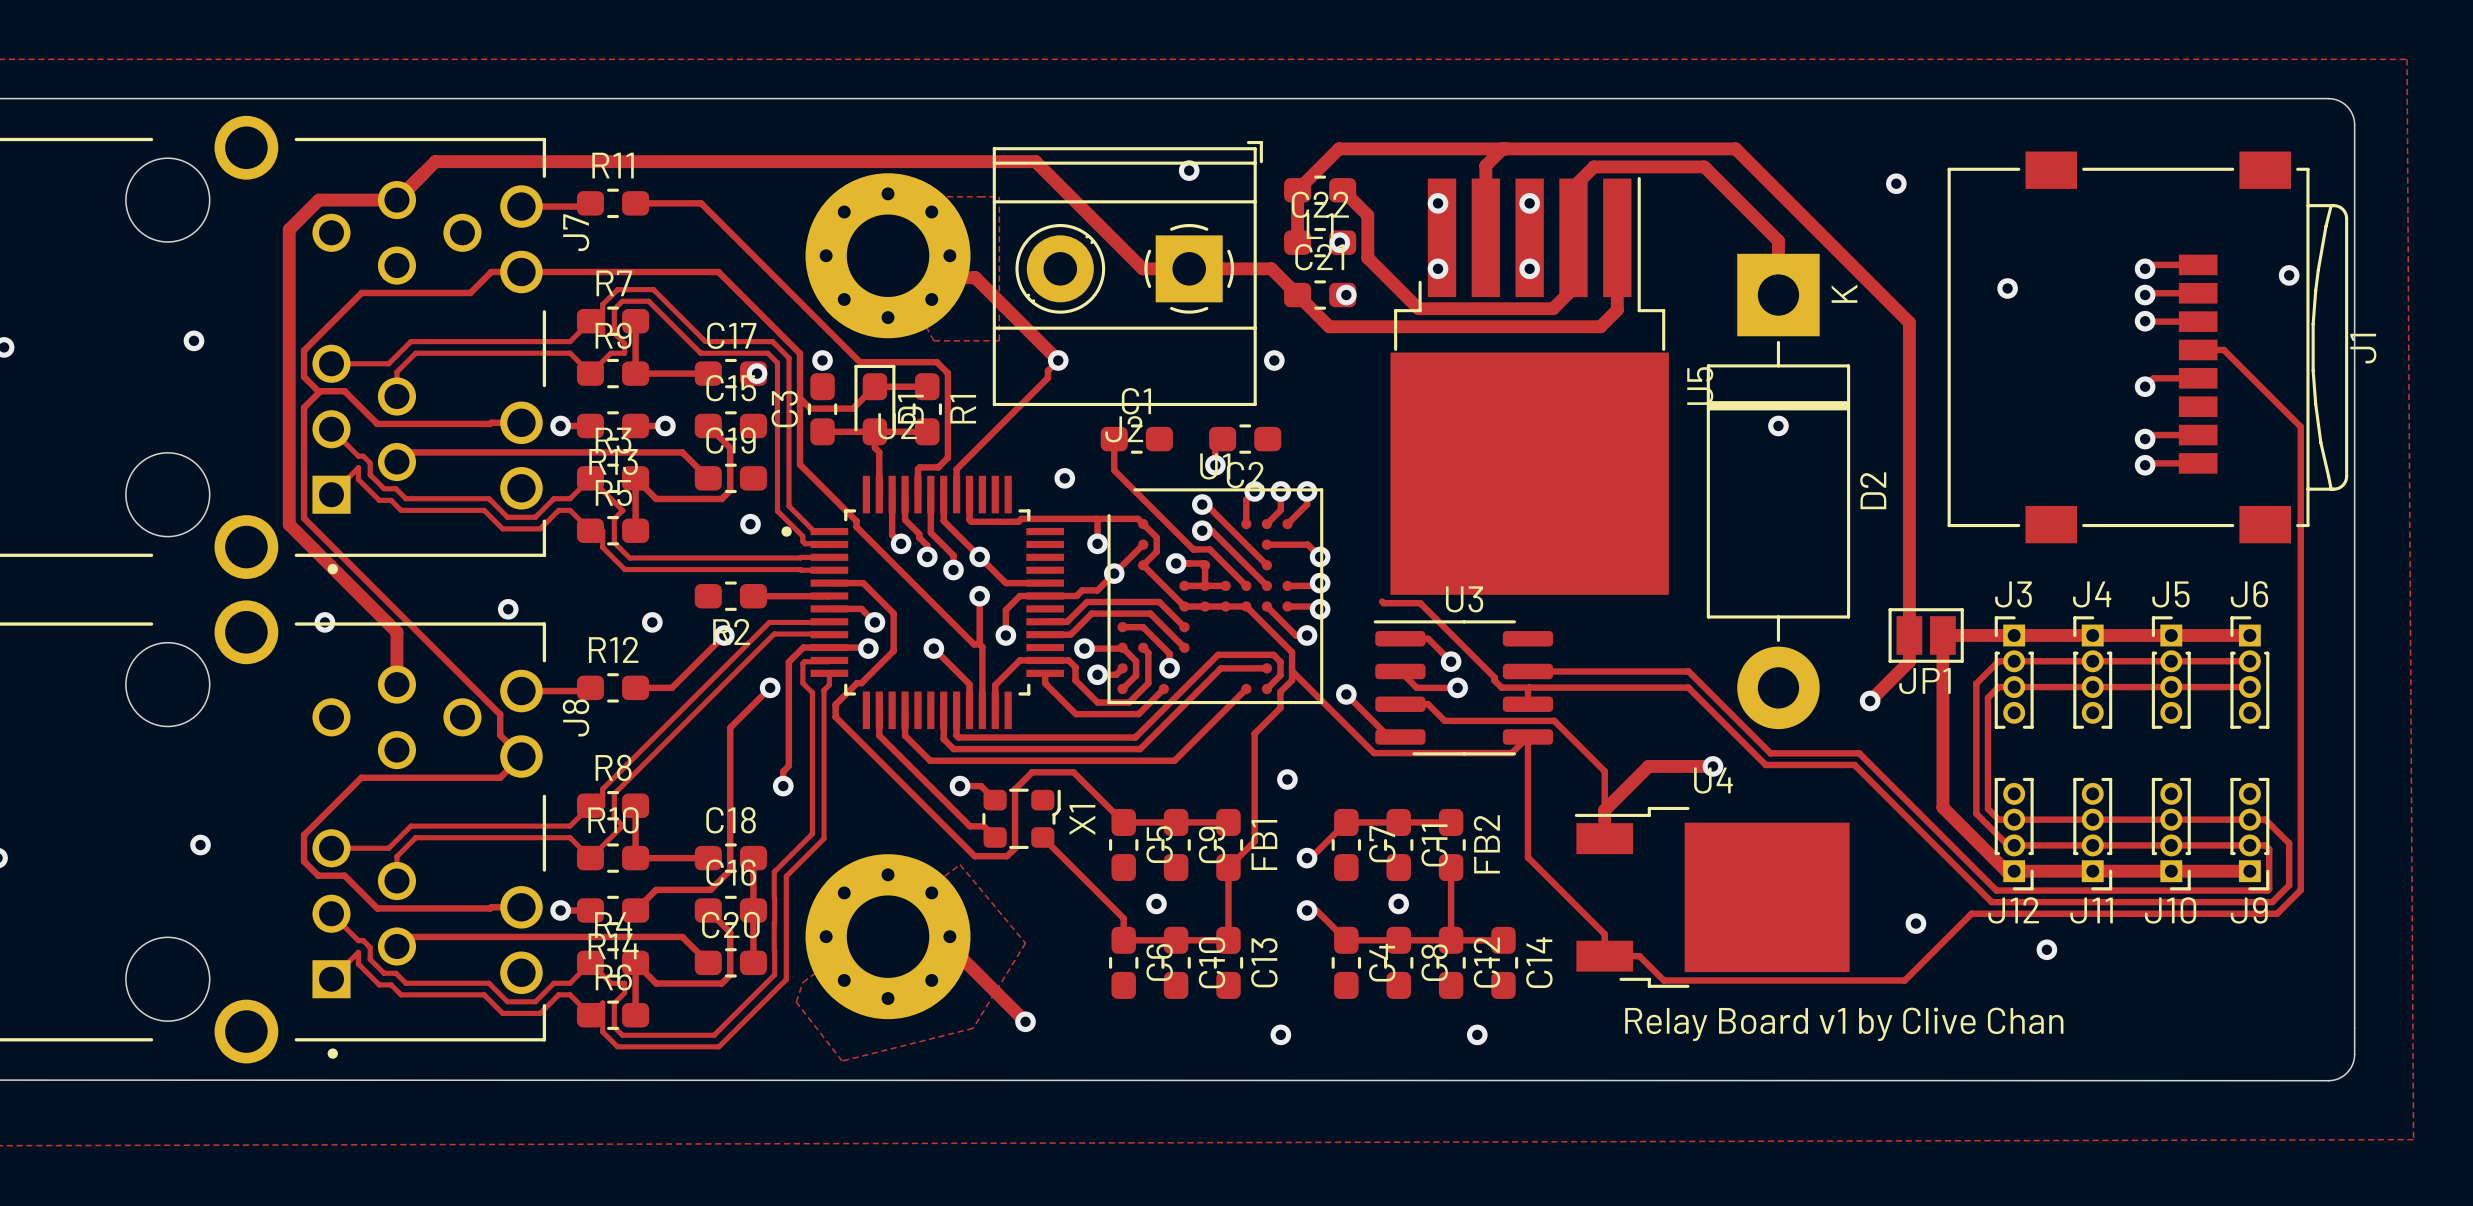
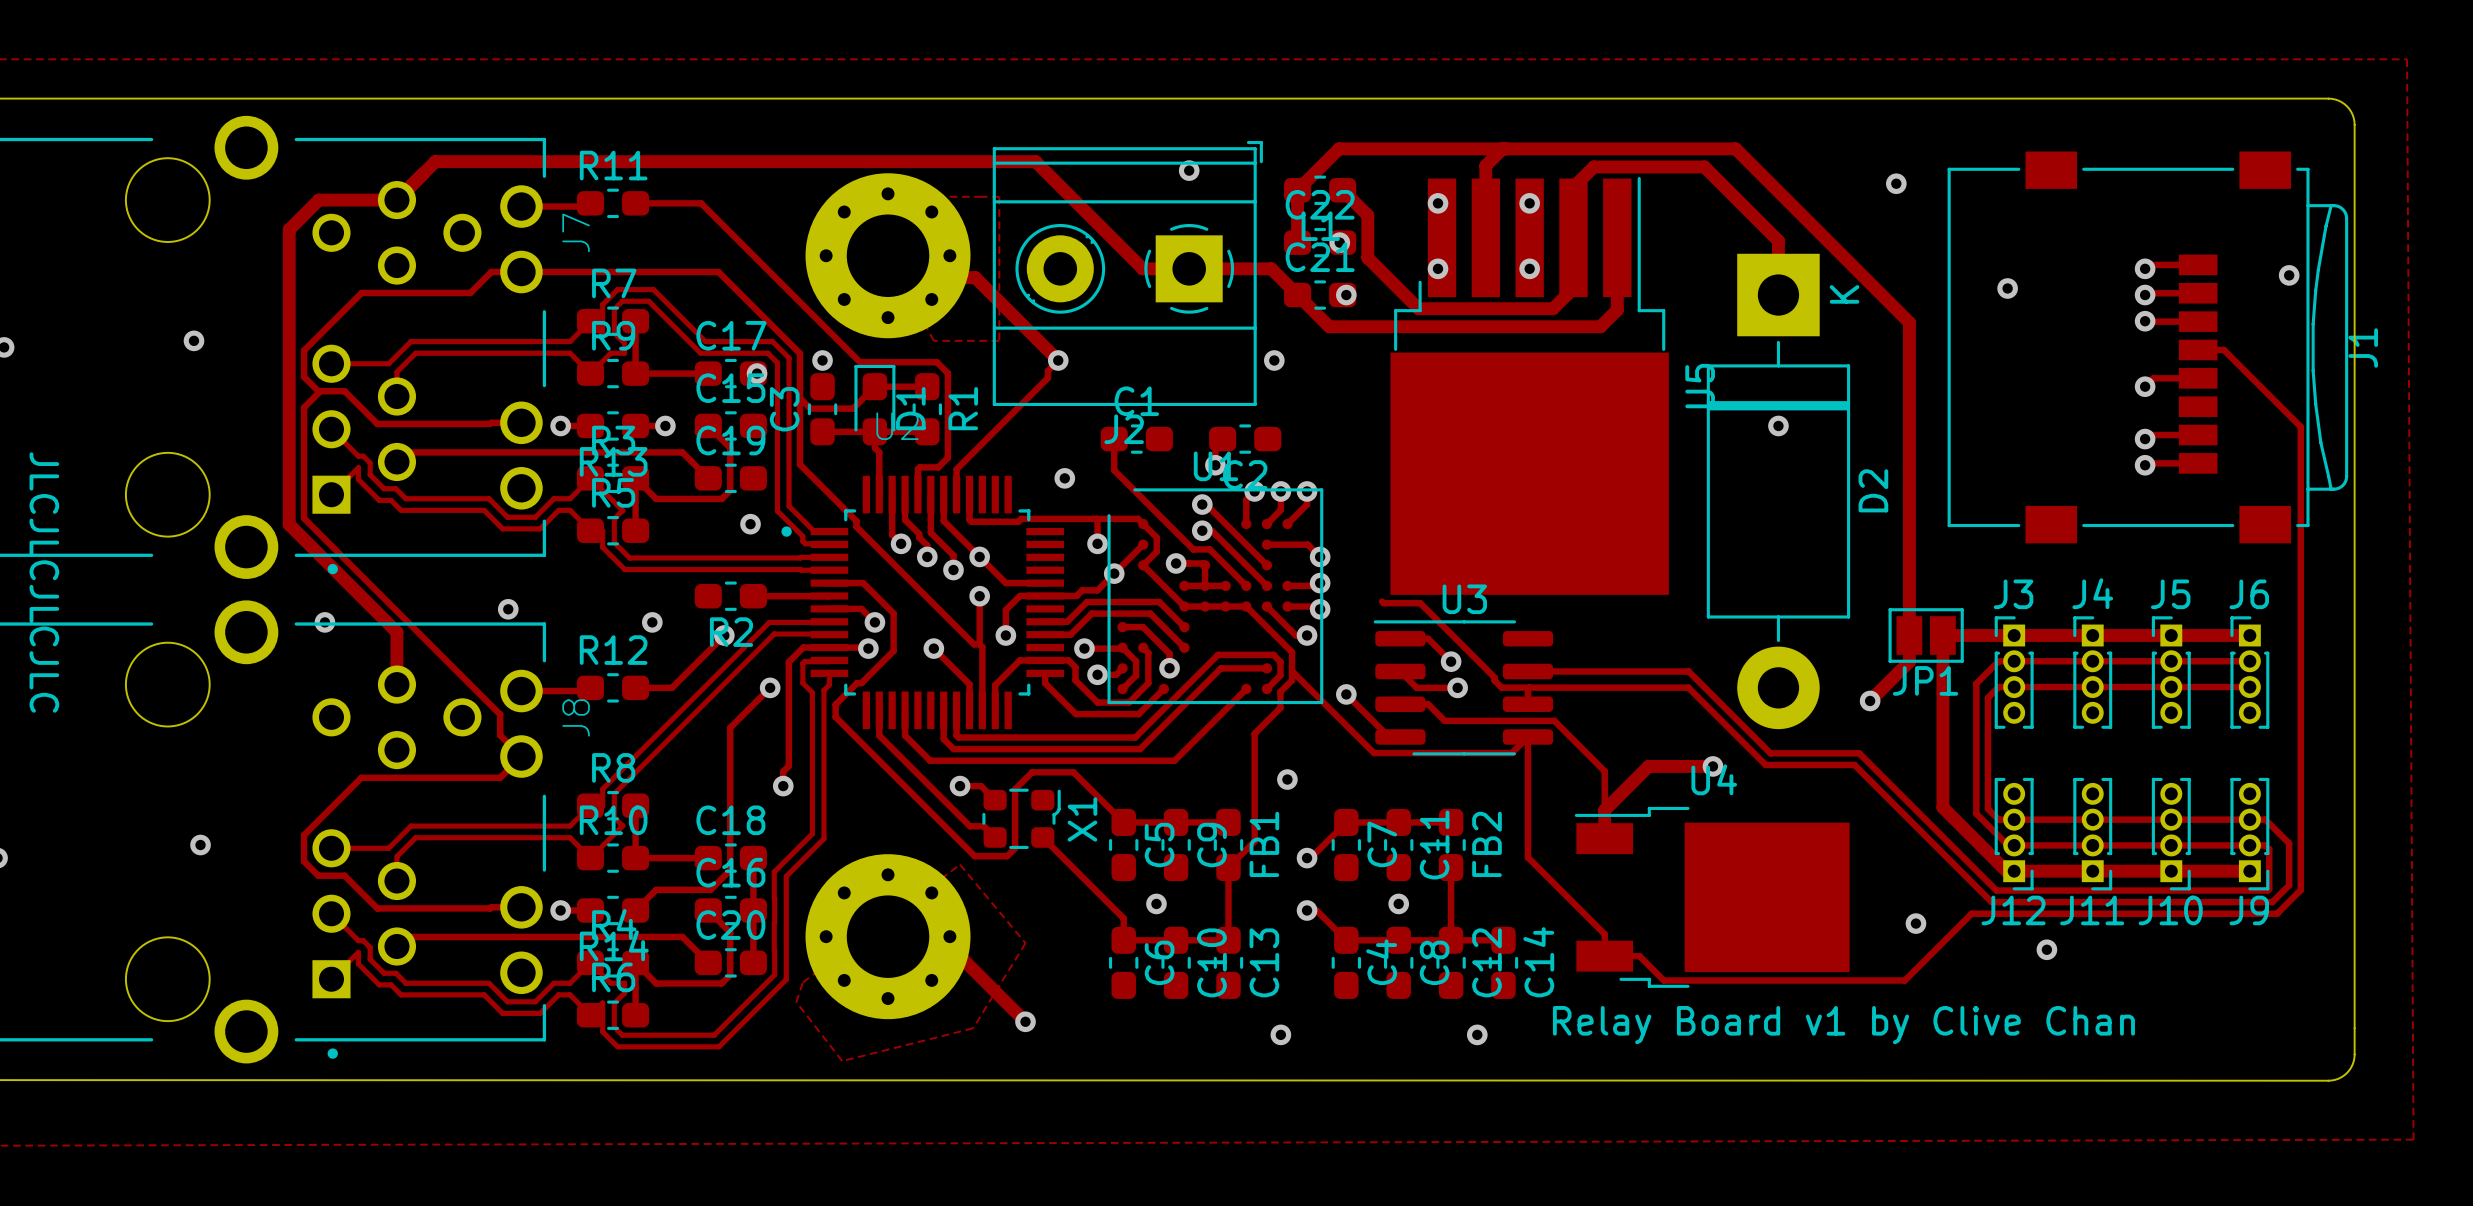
text: none -> JLCJLCJLCJLC (44, 582)

